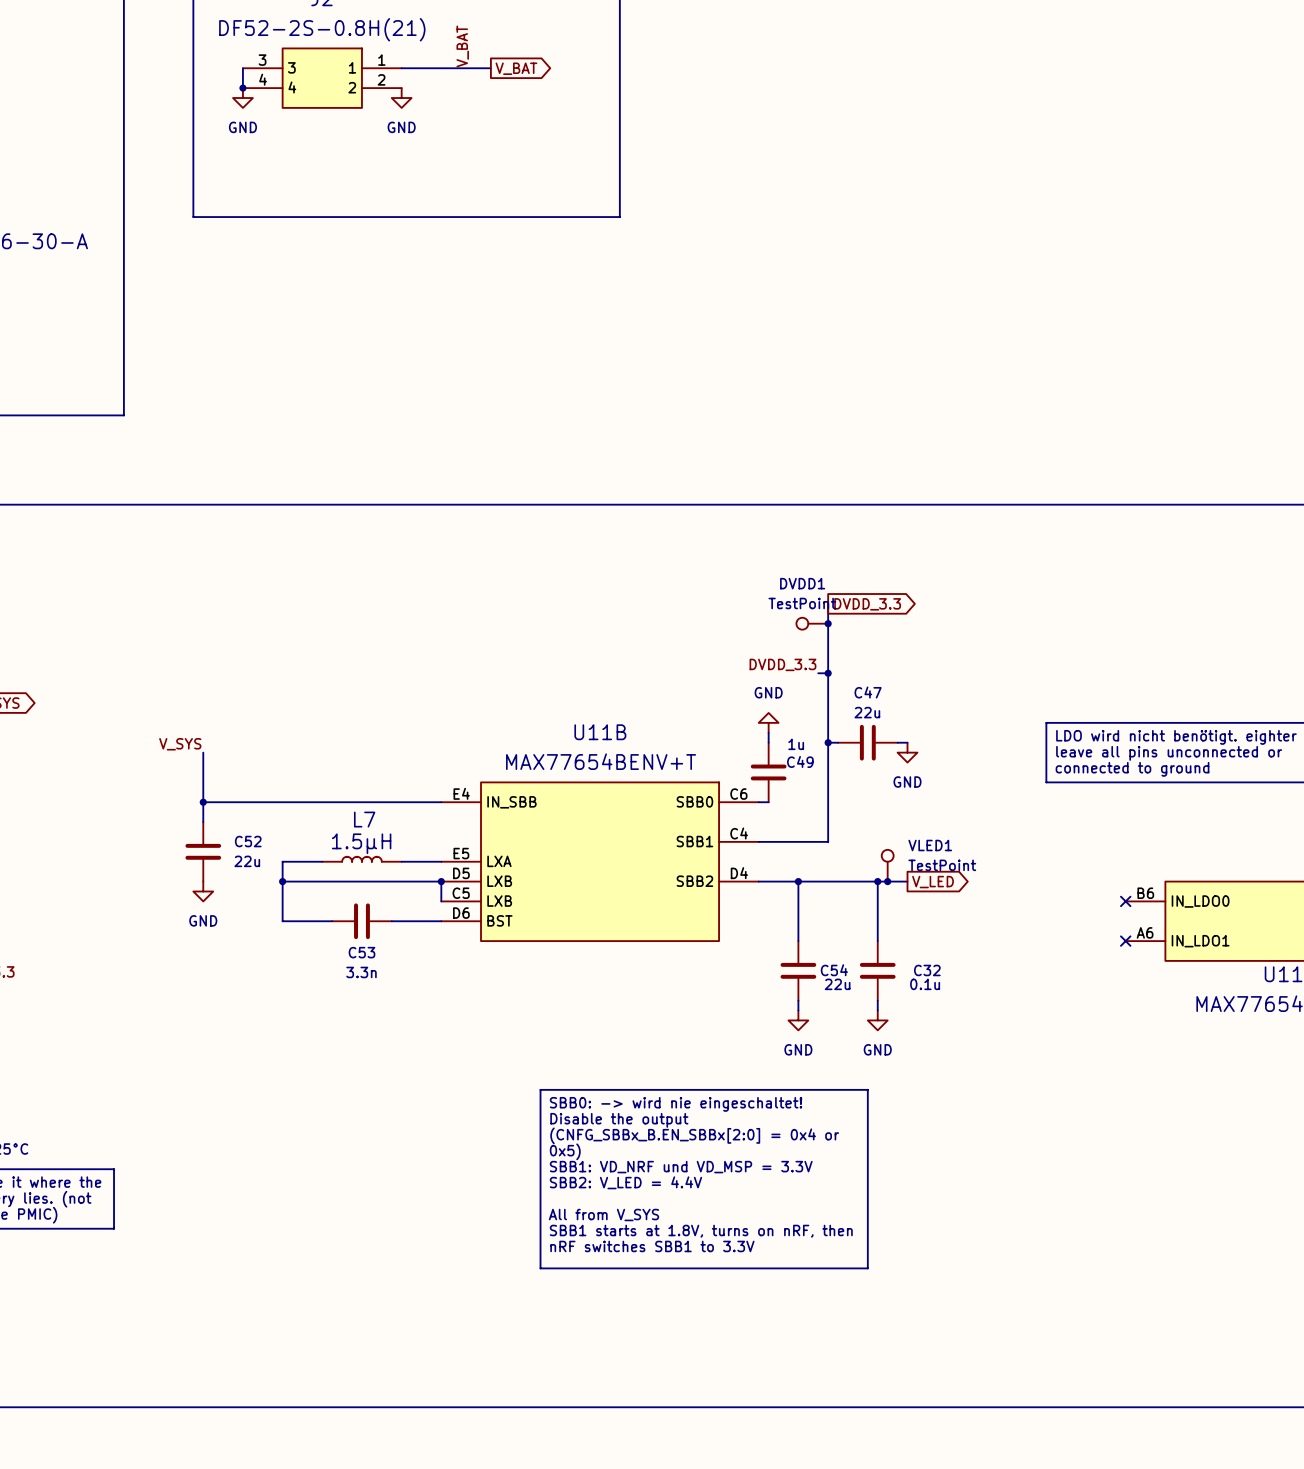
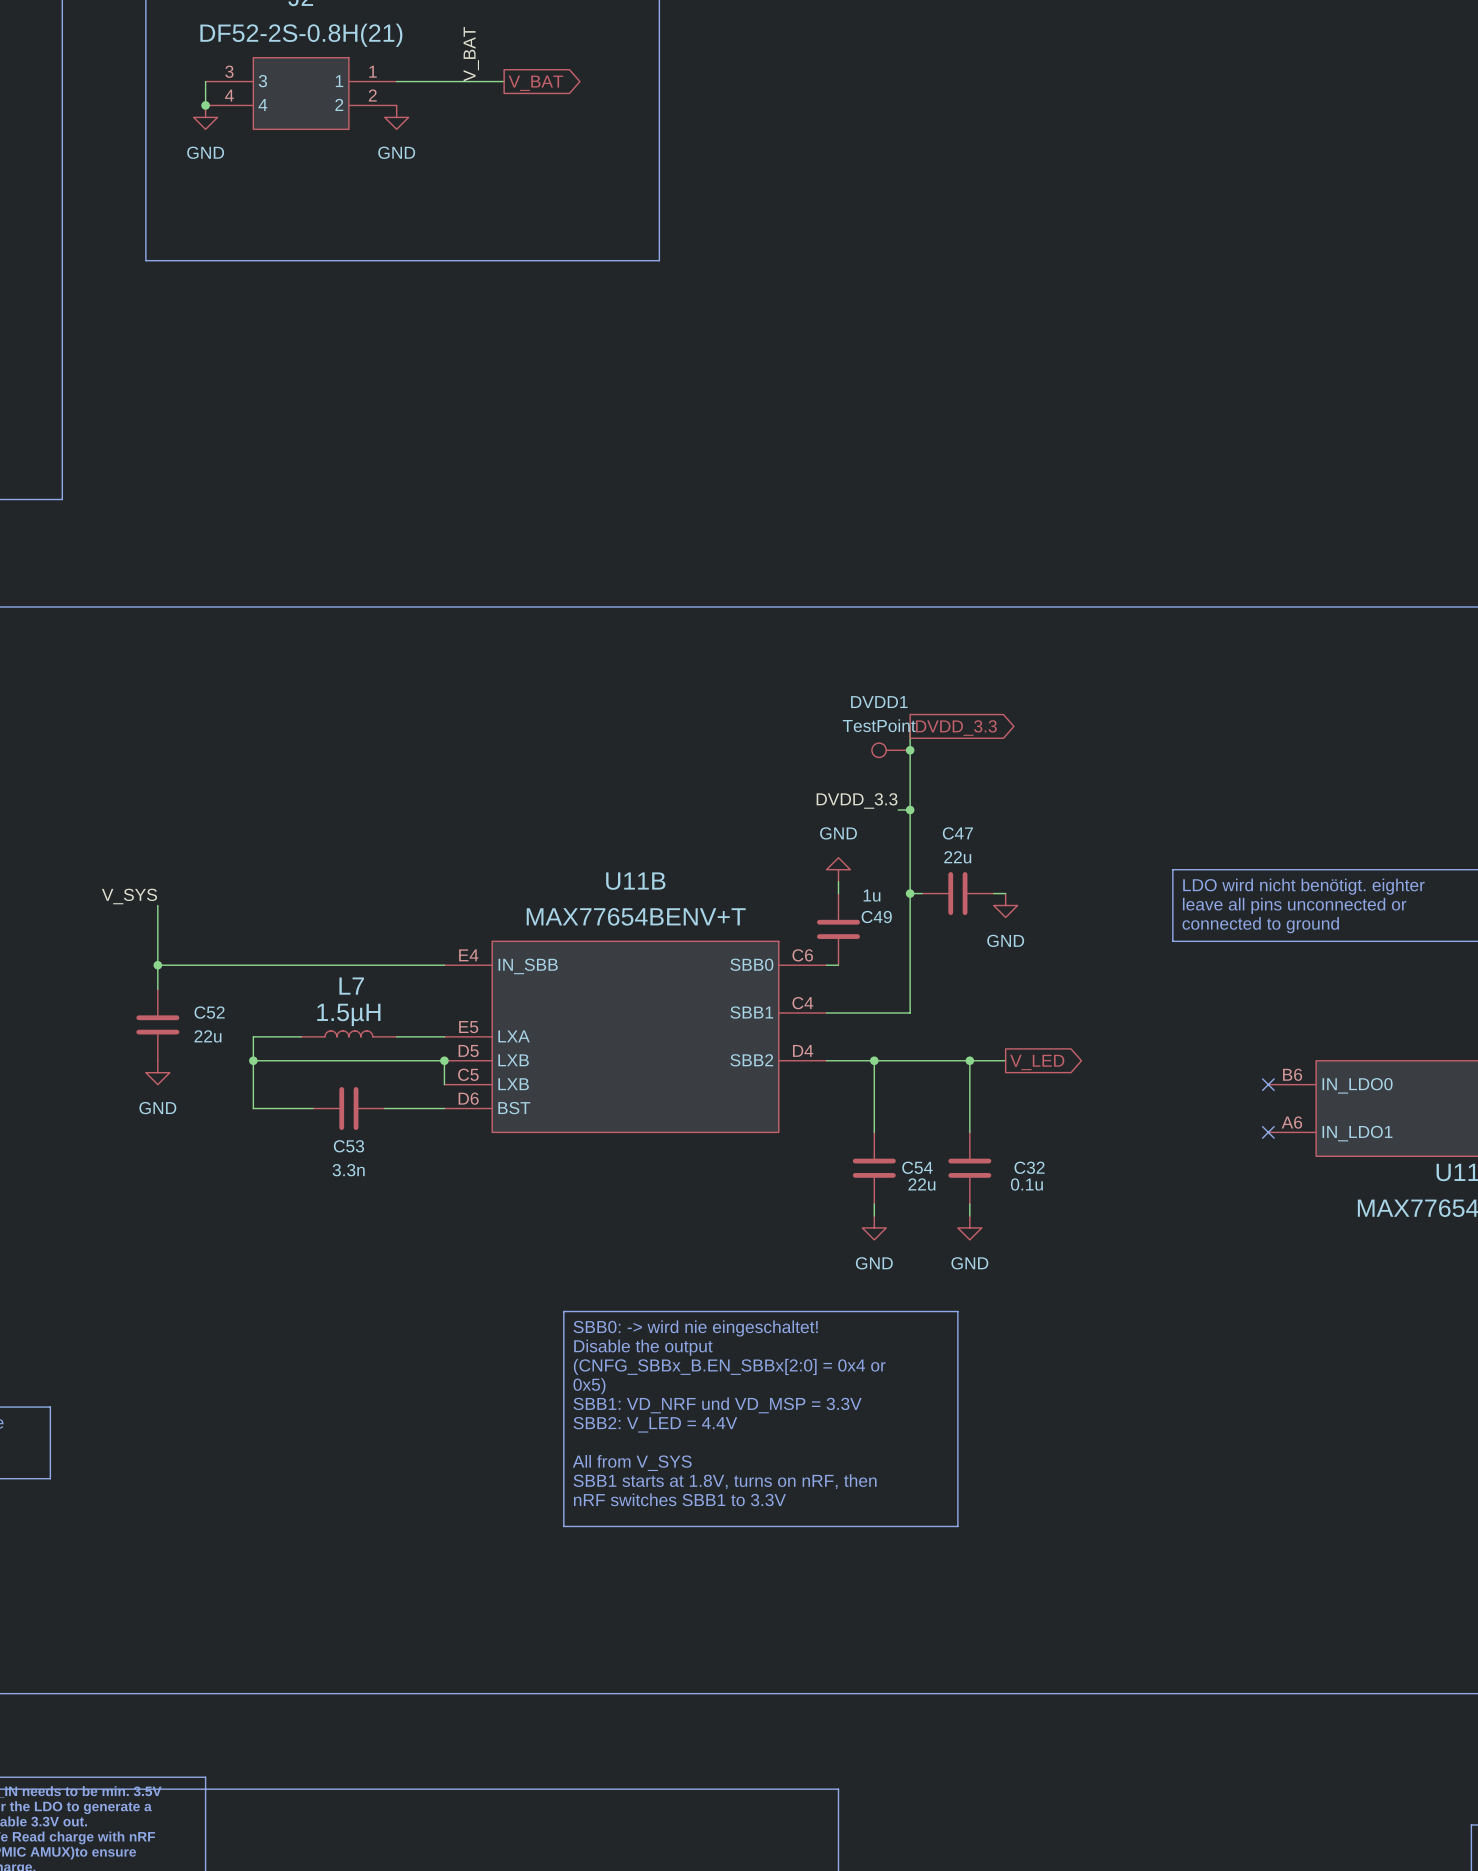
VLED1: TestPoint (887, 865) -> none
junction: (887, 881) -> none

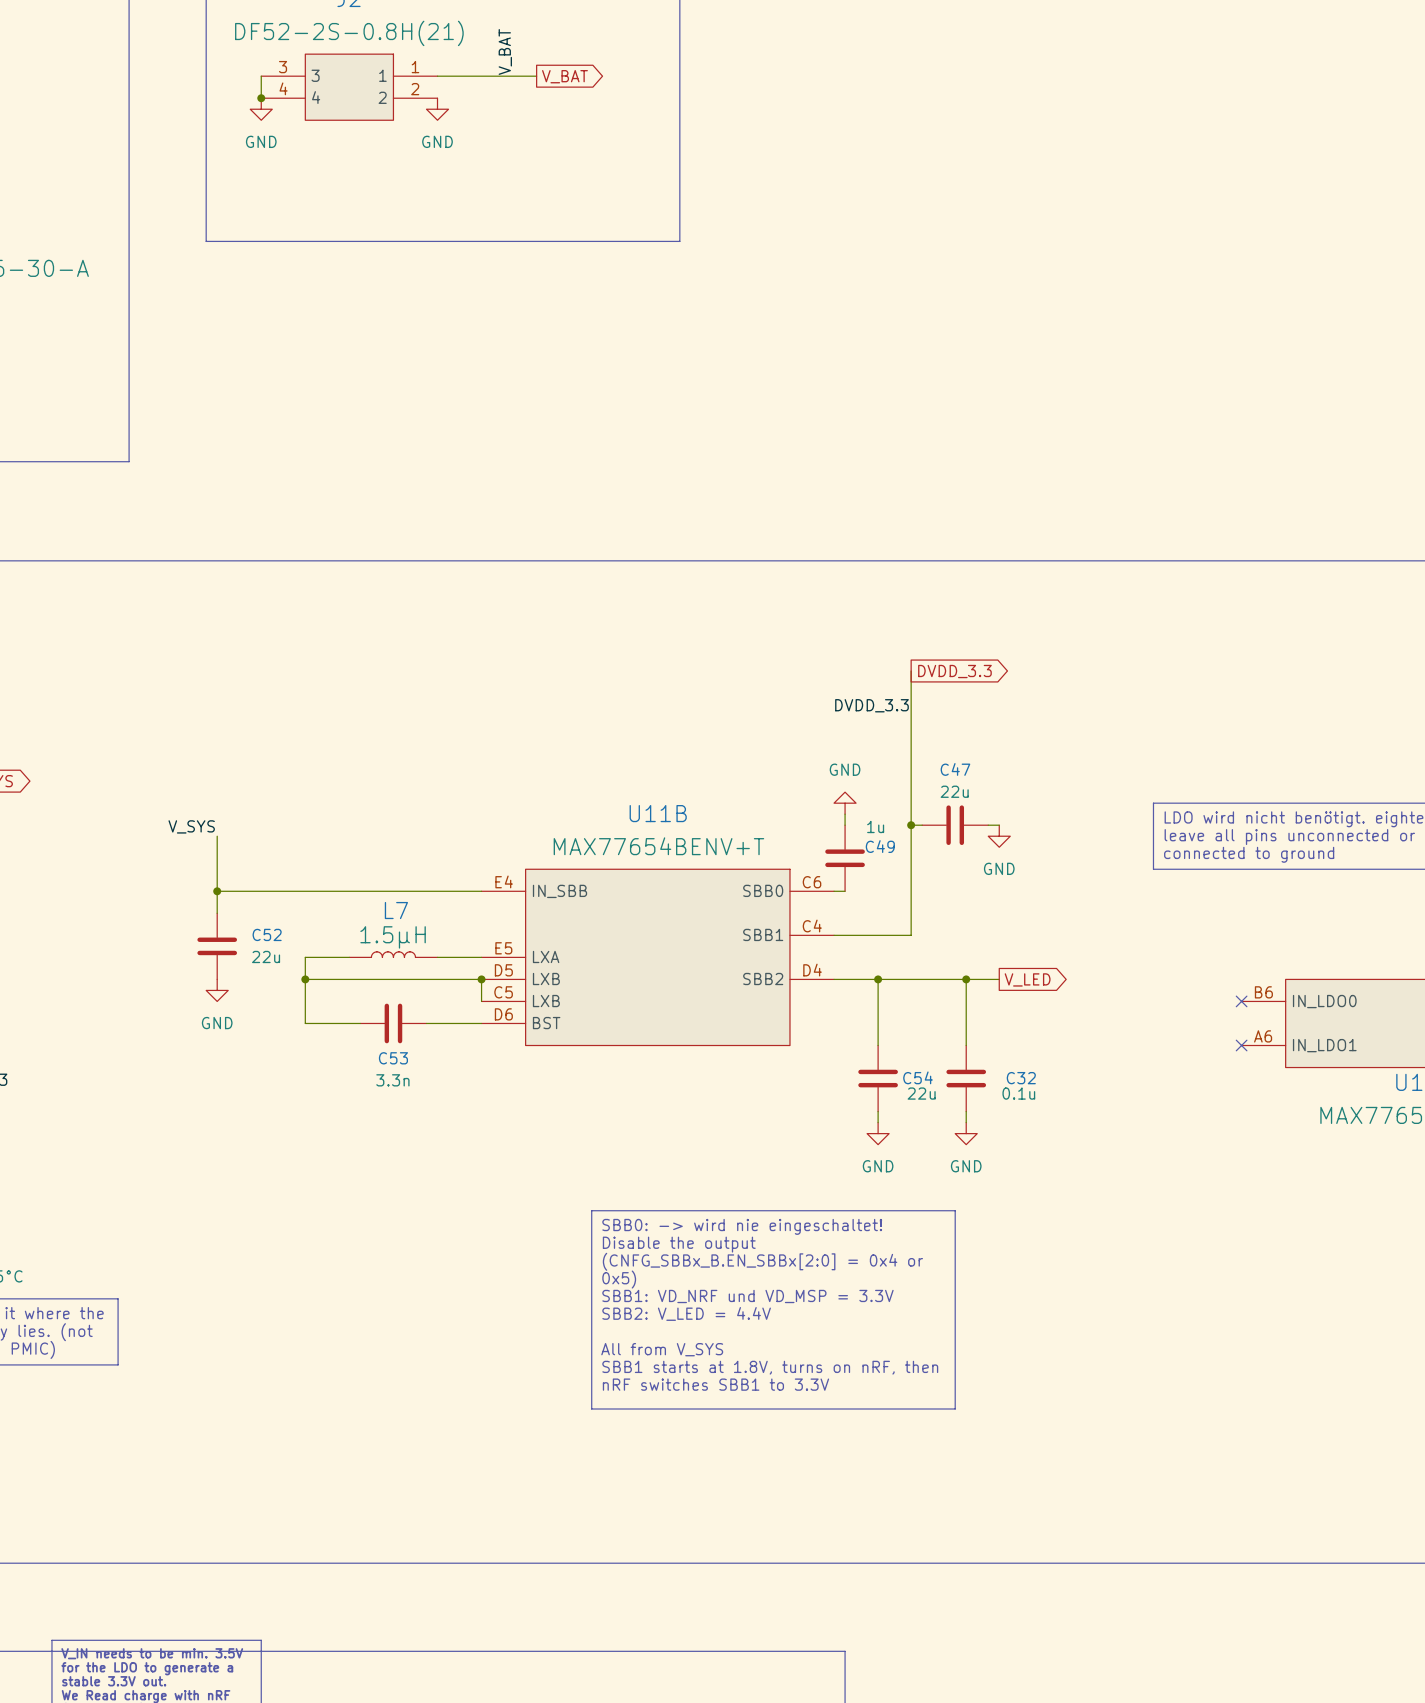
DVDD1: TestPoint (891, 750) -> none
junction: (910, 750) -> none
label position: DVDD_3.3 (857, 800) -> DVDD_3.3 (871, 705)
wire: (898, 809) (910, 809) -> none
junction: (910, 809) -> none

